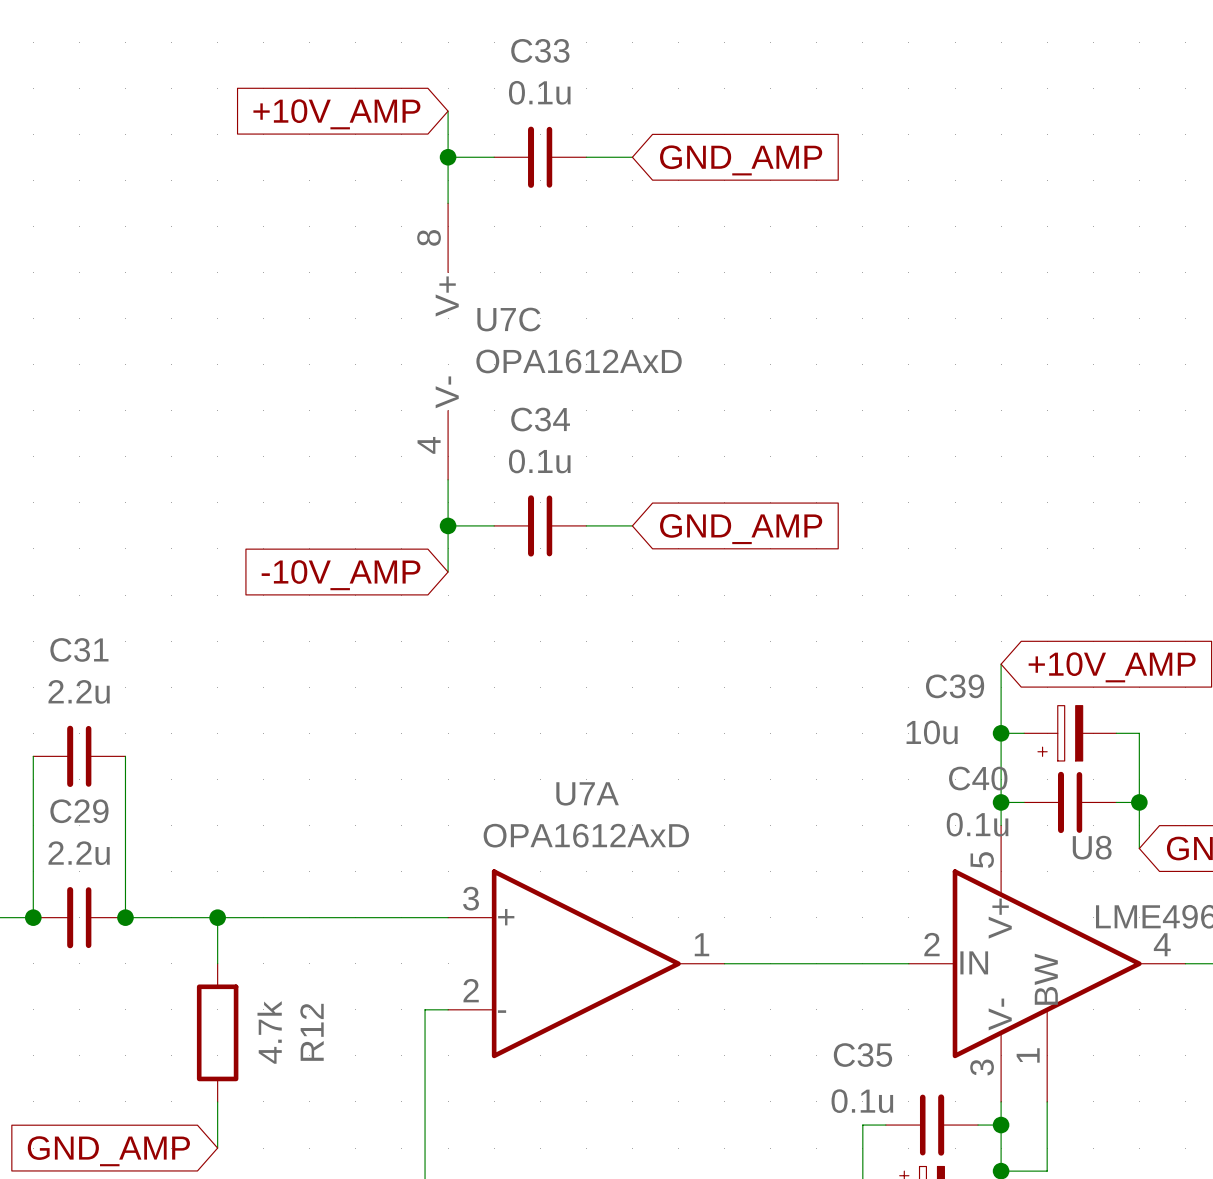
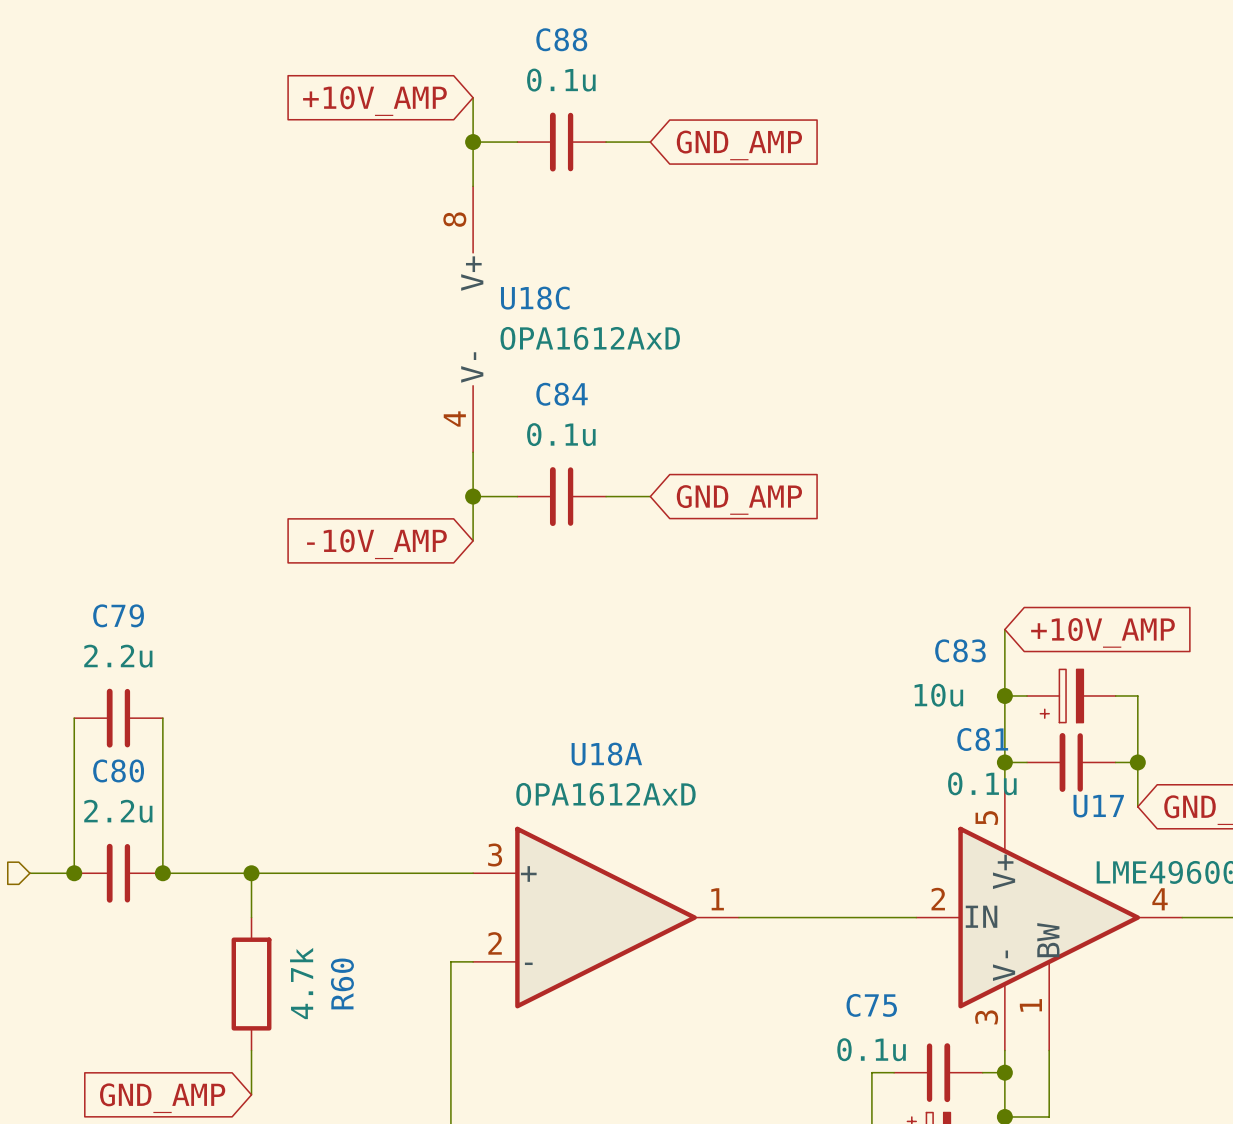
C33 name: C33 (540, 50) -> C88 (561, 39)
U7C name: U7C (508, 319) -> U18C (535, 298)
C34 name: C34 (540, 419) -> C84 (562, 394)
C31 name: C31 (79, 649) -> C79 (118, 615)
C39 name: C39 (955, 686) -> C83 (960, 650)
C40 name: C40 (978, 778) -> C81 (982, 739)
U7A name: U7A (587, 793) -> U18A (606, 754)
C29 name: C29 (79, 811) -> C80 (118, 770)
U8 name: U8 (1092, 847) -> U17 (1098, 806)
R12 name: R12 (312, 1032) -> R60 (342, 983)
C35 name: C35 (862, 1055) -> C75 (871, 1005)

